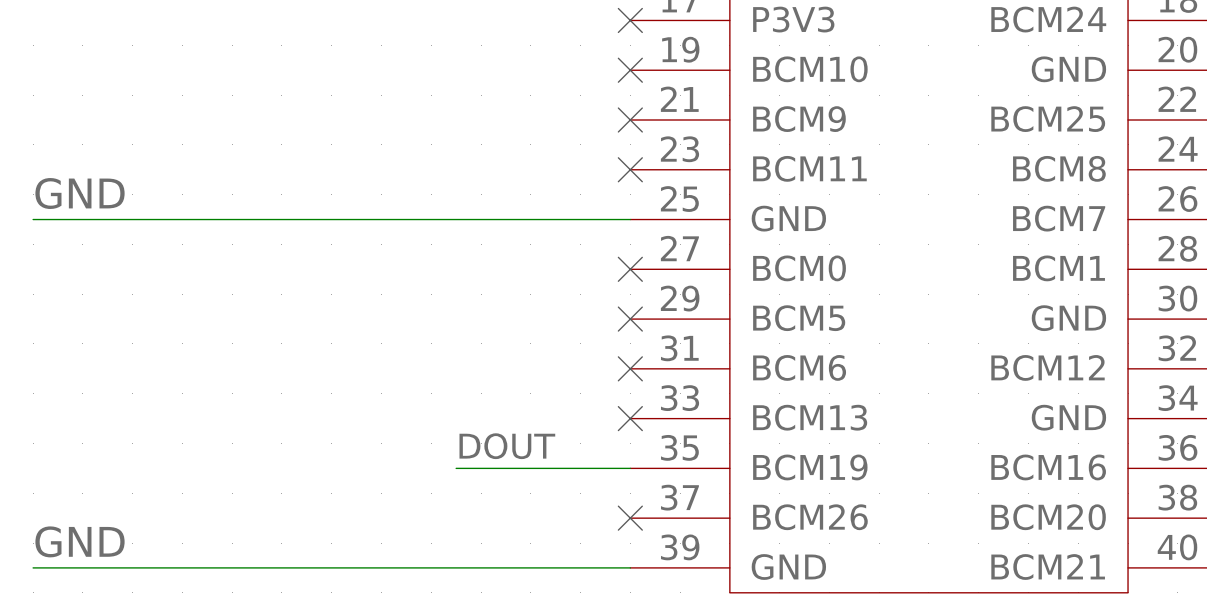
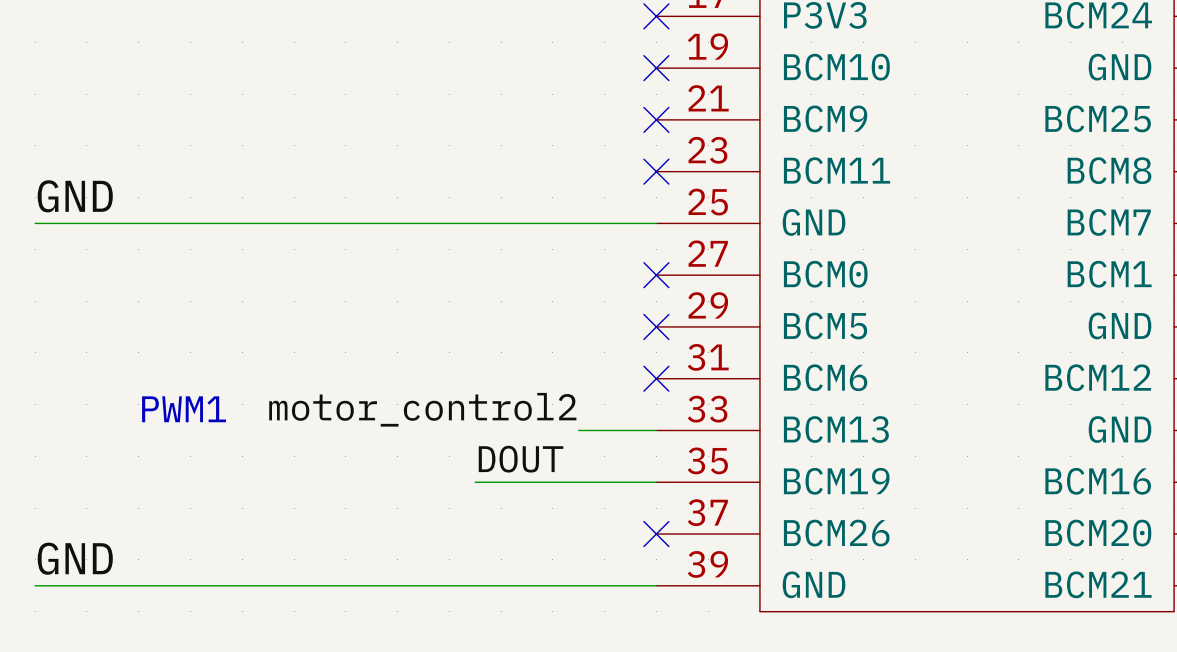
text: none -> PWM1 (184, 409)
label: none -> motor_control2 (422, 409)
wire: none -> (578, 430) (656, 430)
no-connect mark: (630, 418) -> none

